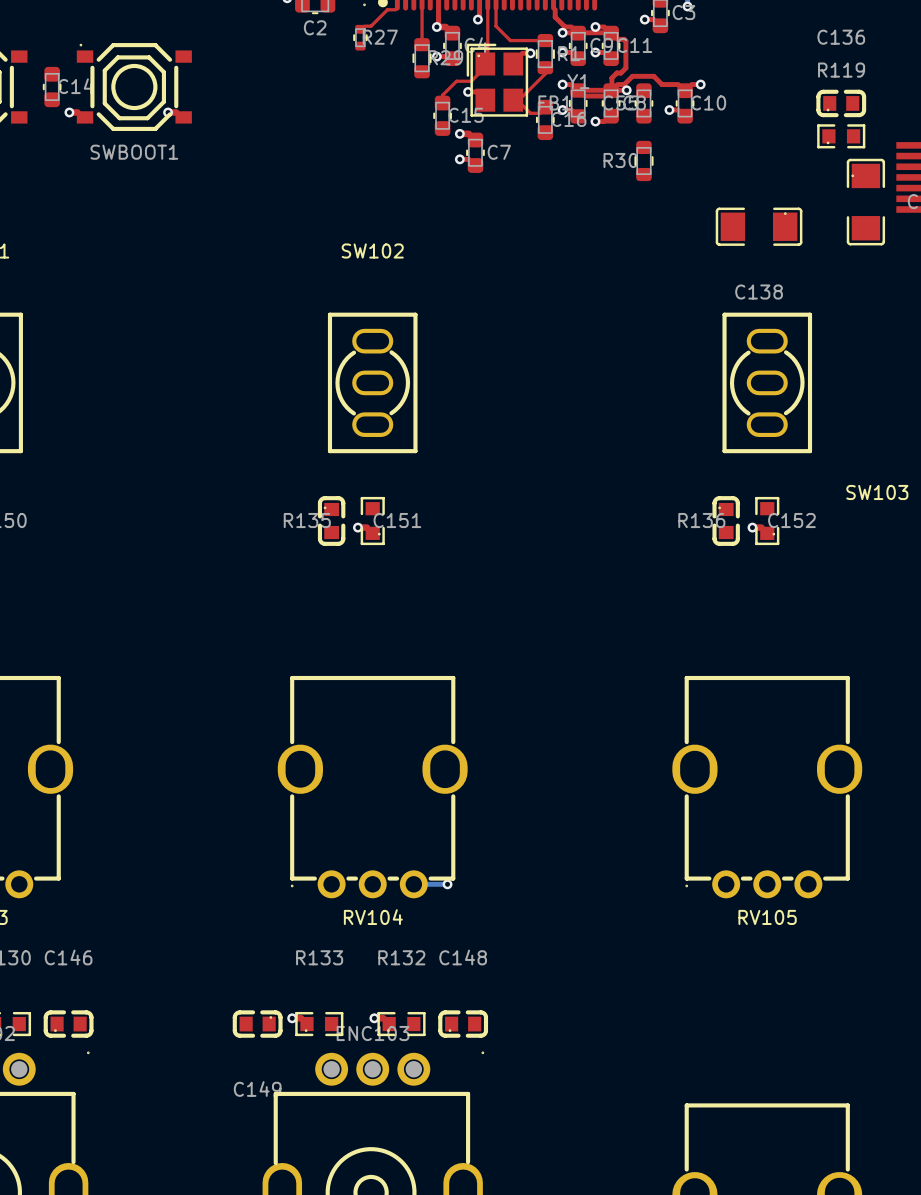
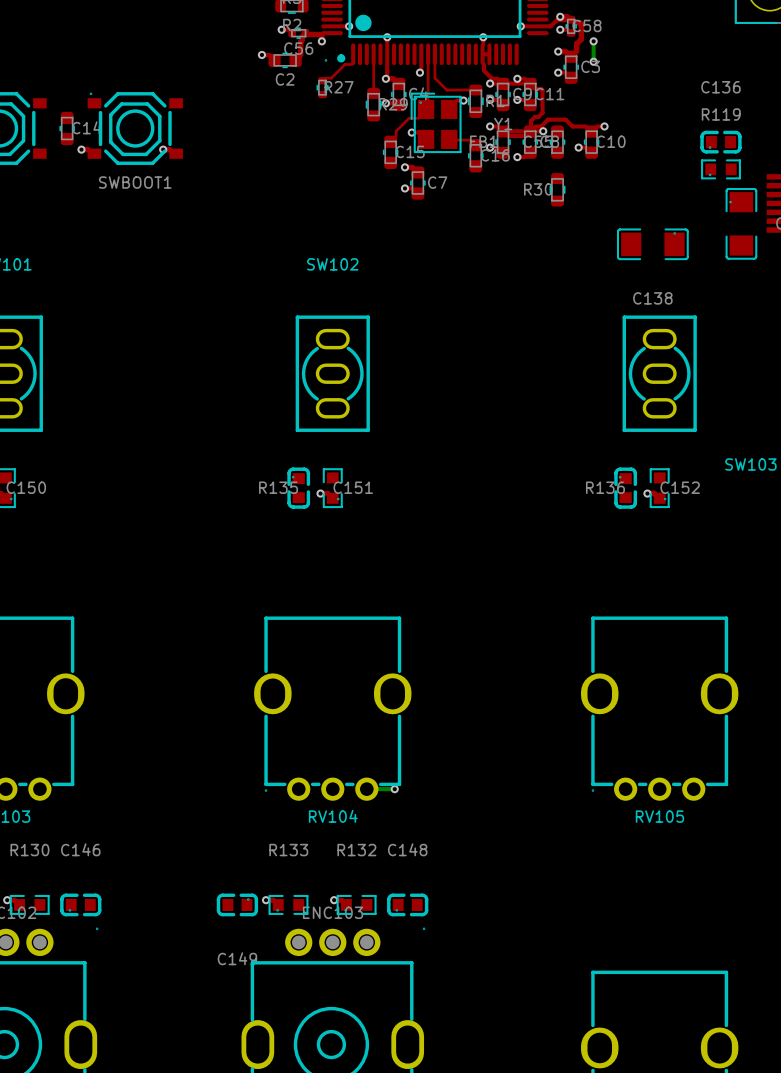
top track: (485, 67) (471, 81) (456, 81) (442, 95) (442, 103) -> none
top track: (545, 67) (545, 73) (519, 100) -> none
top track: none -> (418, 118) (409, 118) (396, 131) (396, 136)
top track: none -> (456, 140) (470, 140)
top track: (522, 105) (530, 113) (540, 113) -> none

